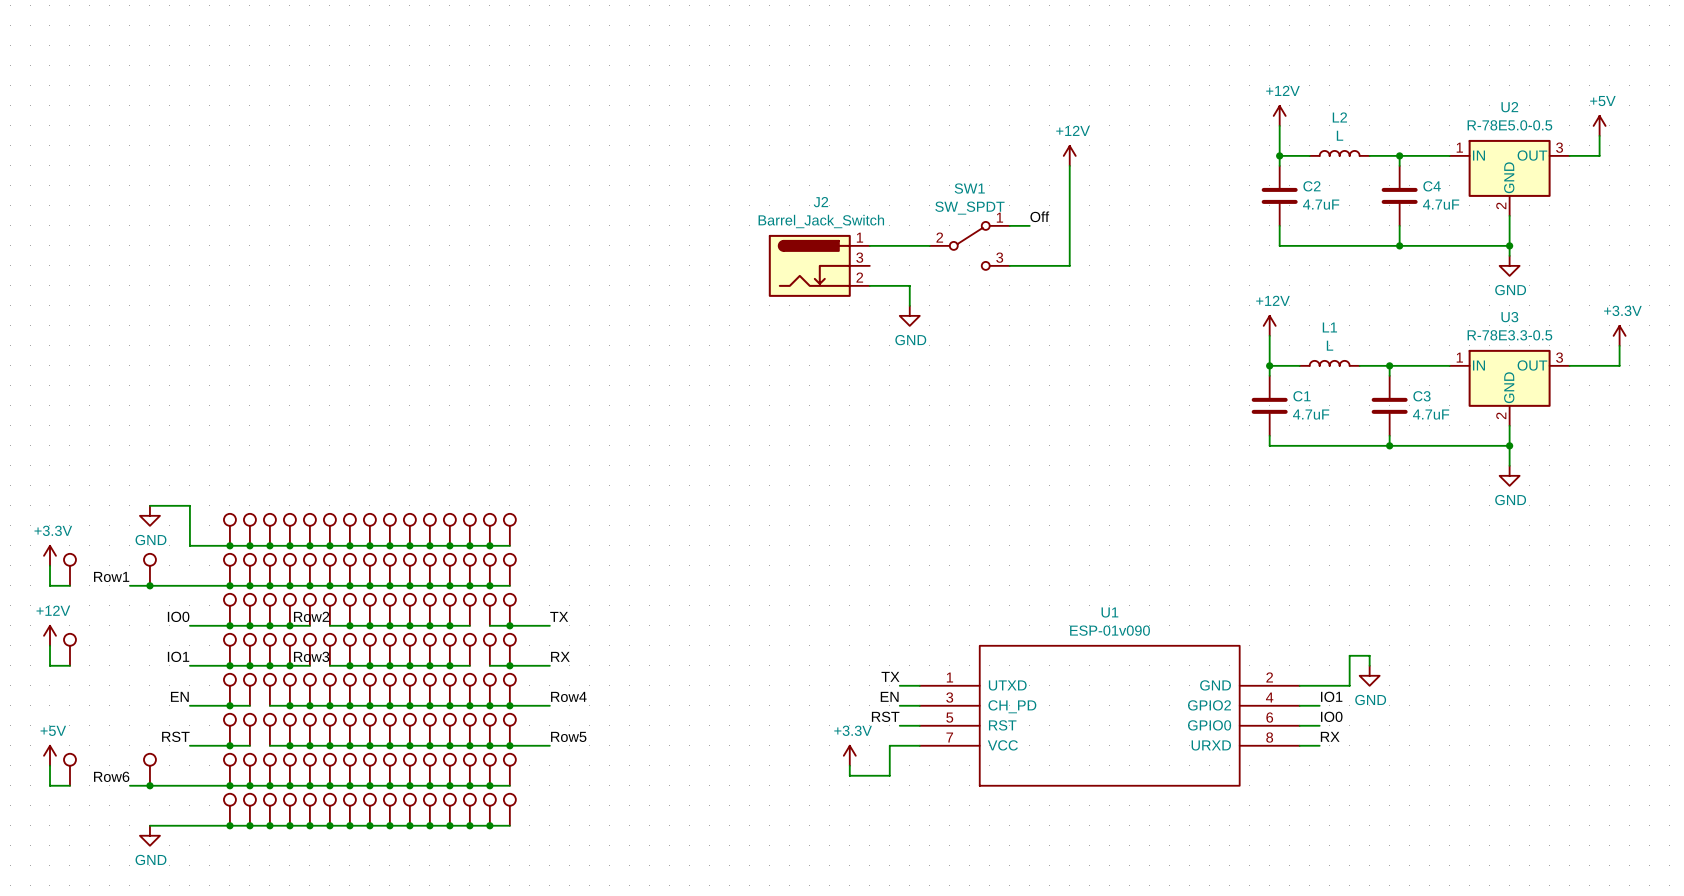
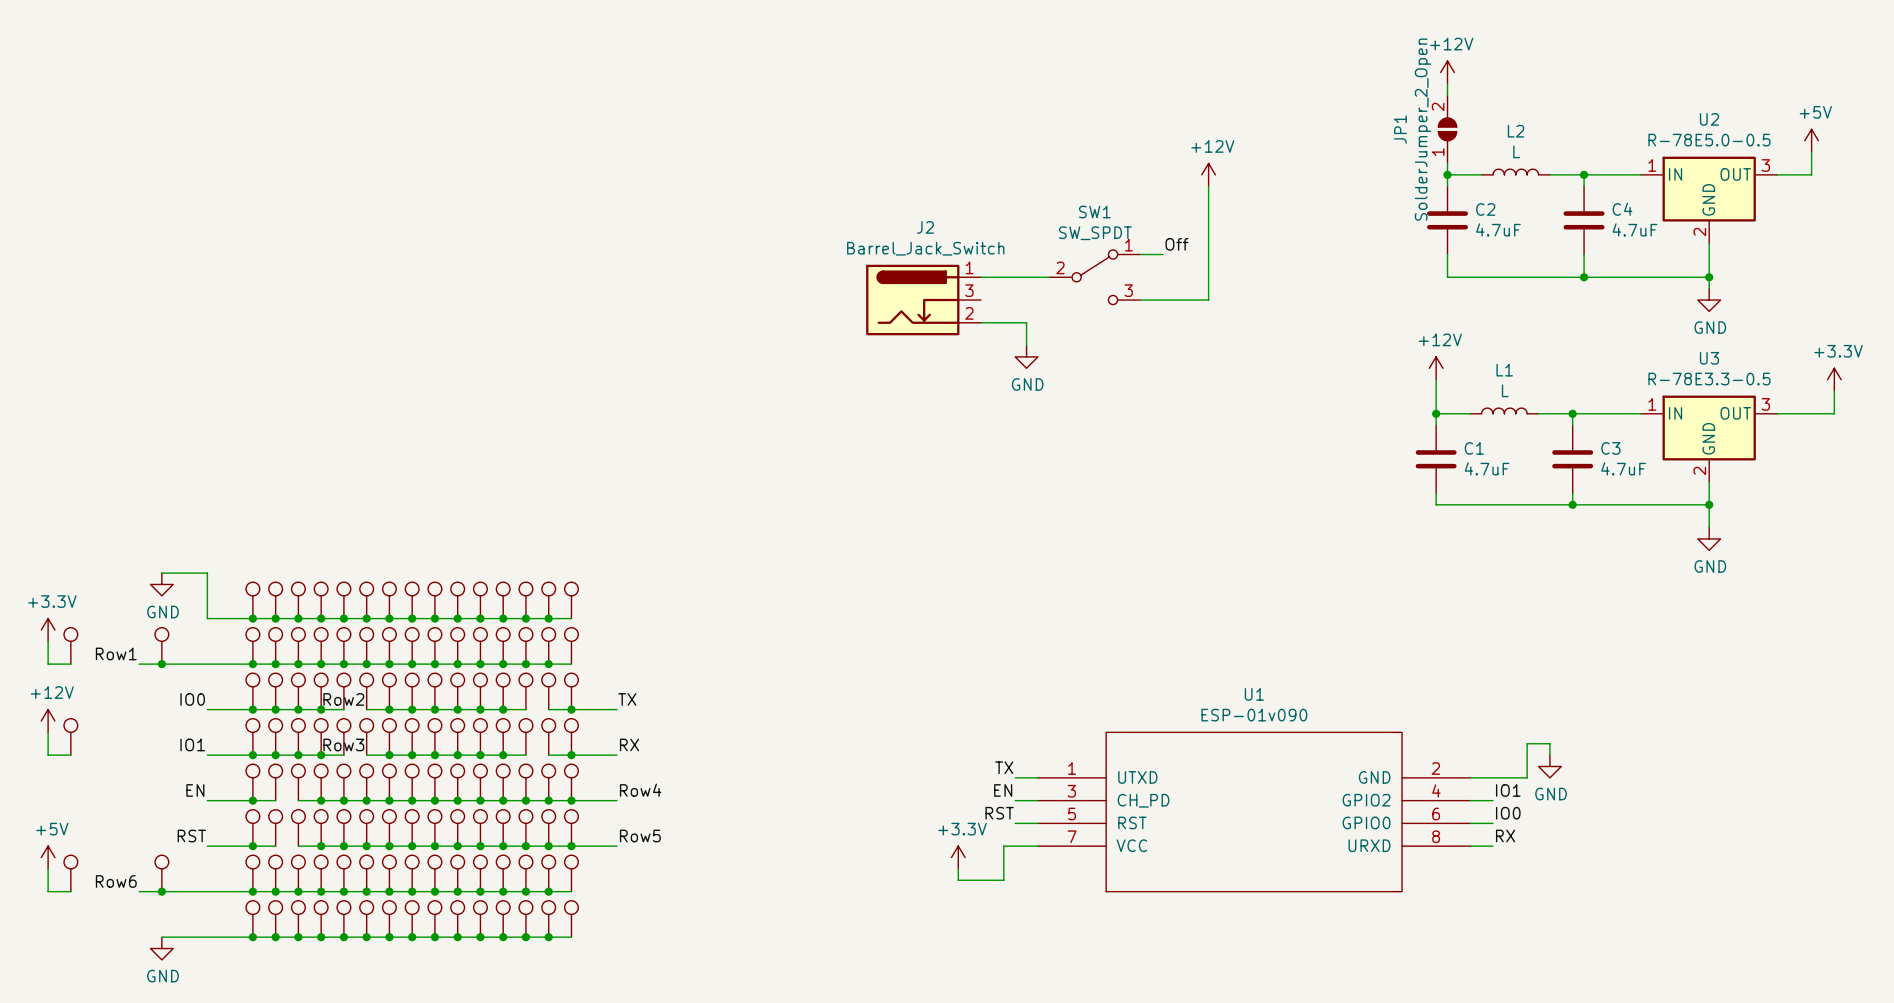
wire: none -> (1447, 83) (1447, 95)
power symbol position: +12V (1279, 115) -> +12V (1447, 72)
JP1: none -> SolderJumper_2_Open (1447, 129)

